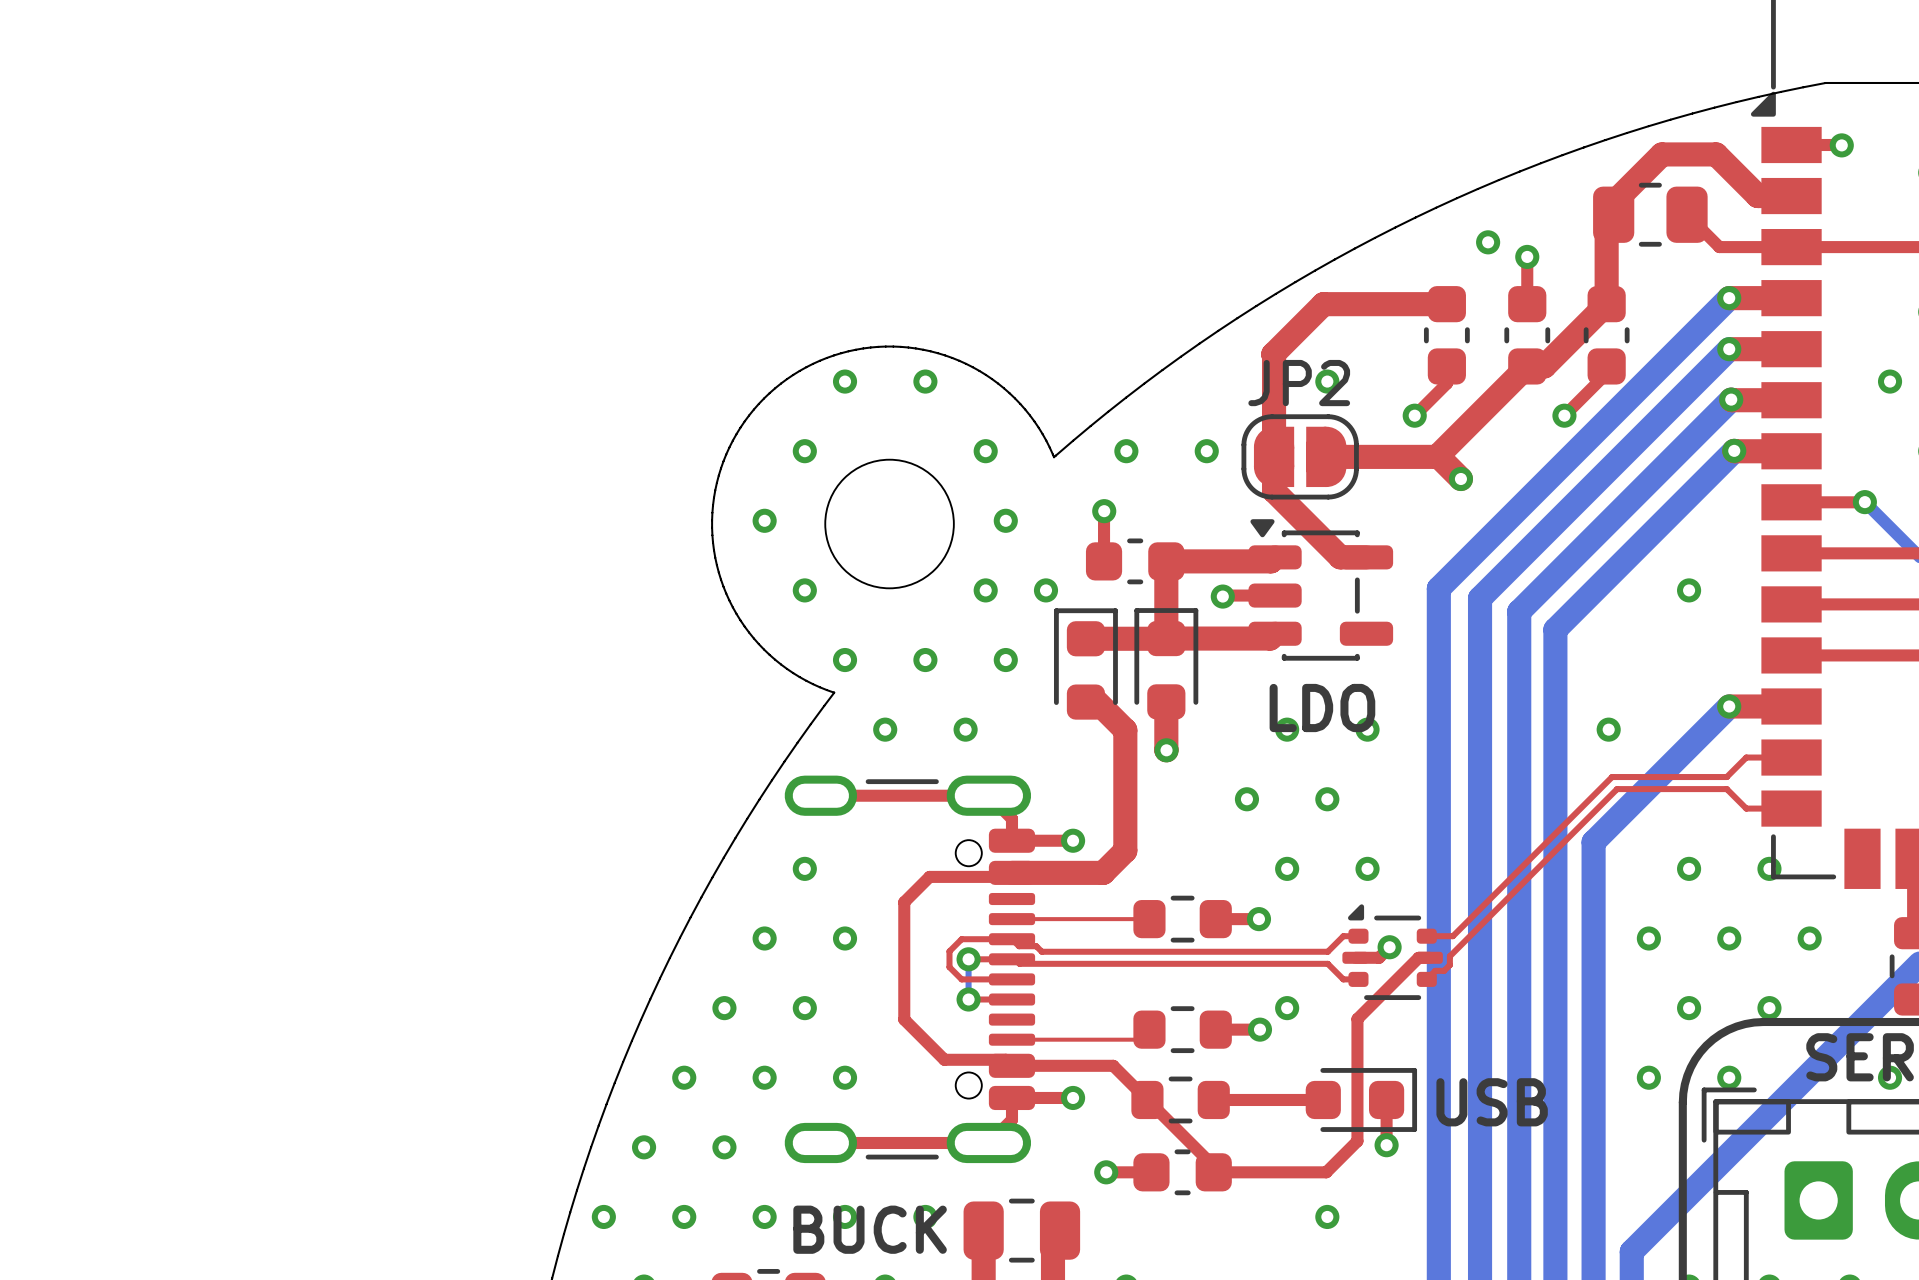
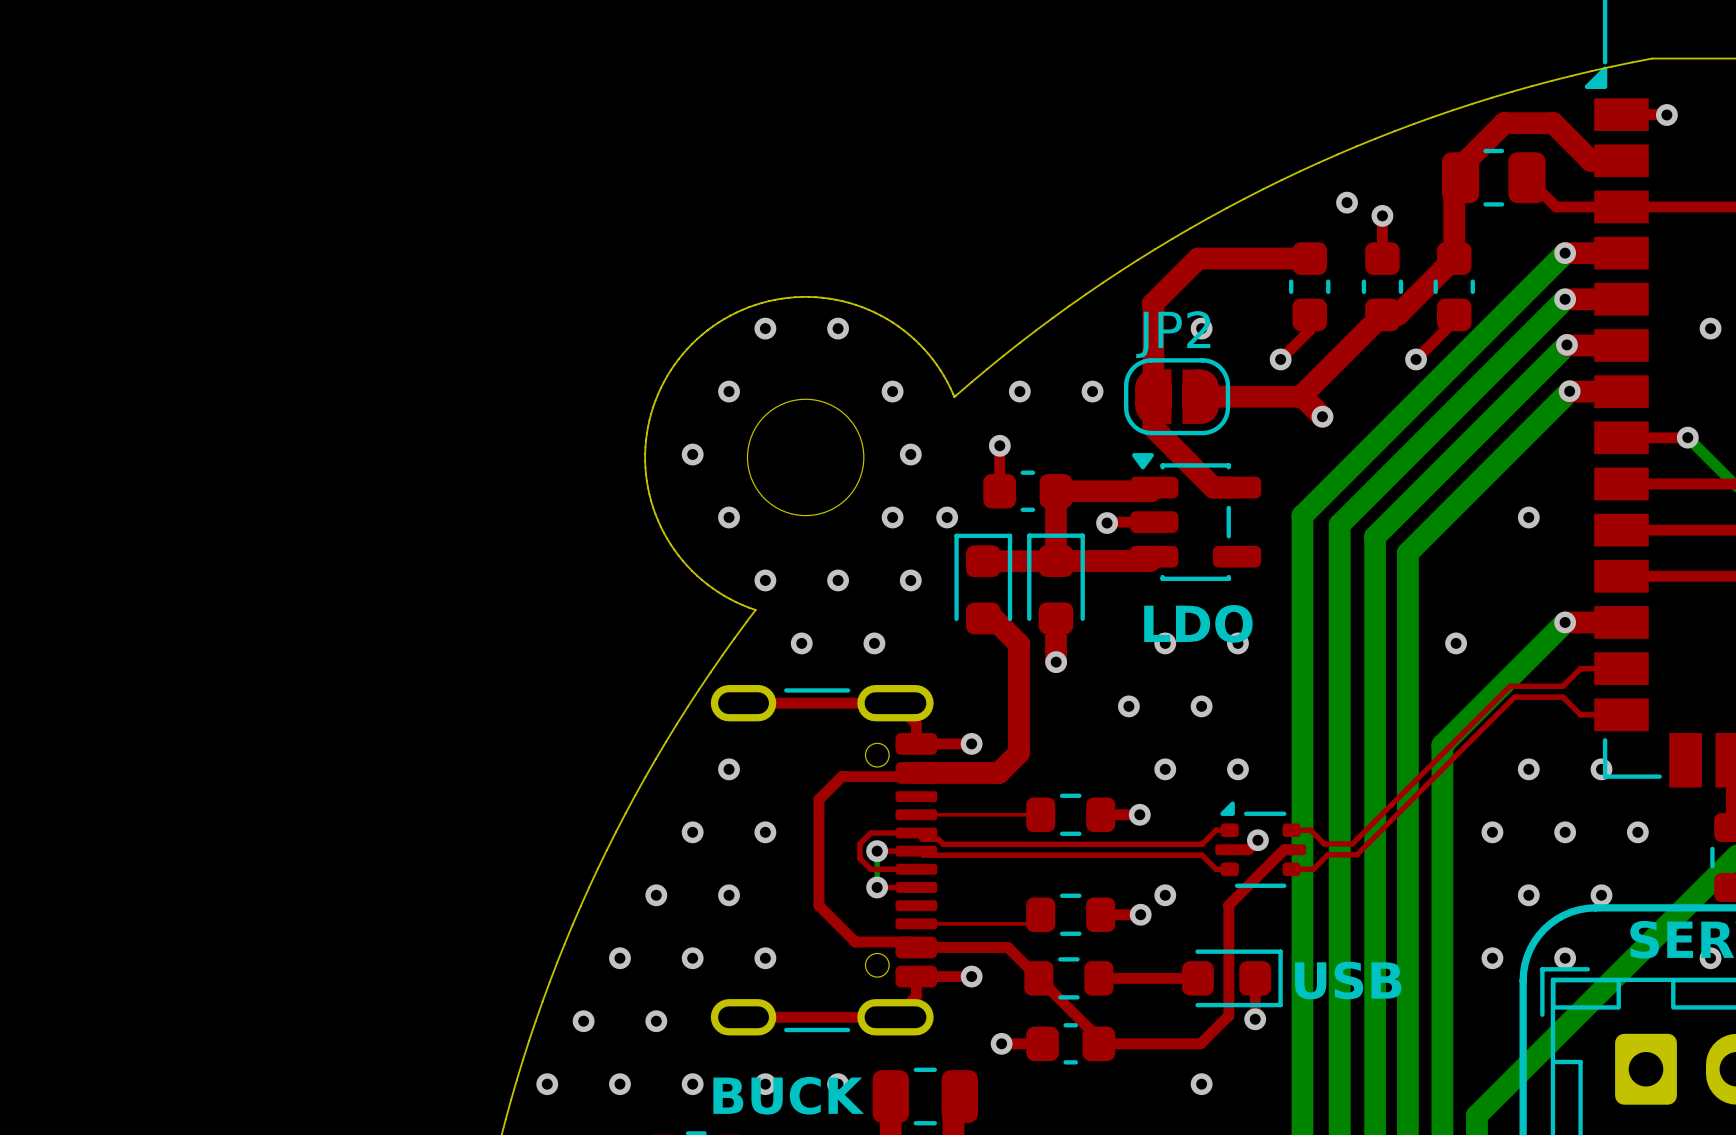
top track: (1668, 777) (1612, 777) (1452, 936) (1447, 936) -> (1510, 686) (1352, 843) (1324, 843) (1310, 830)
top track: (1673, 789) (1617, 789) (1449, 956) (1449, 965) (1444, 970) (1435, 970) (1426, 979) -> (1514, 697) (1356, 854) (1327, 854) (1313, 869) (1291, 869)

